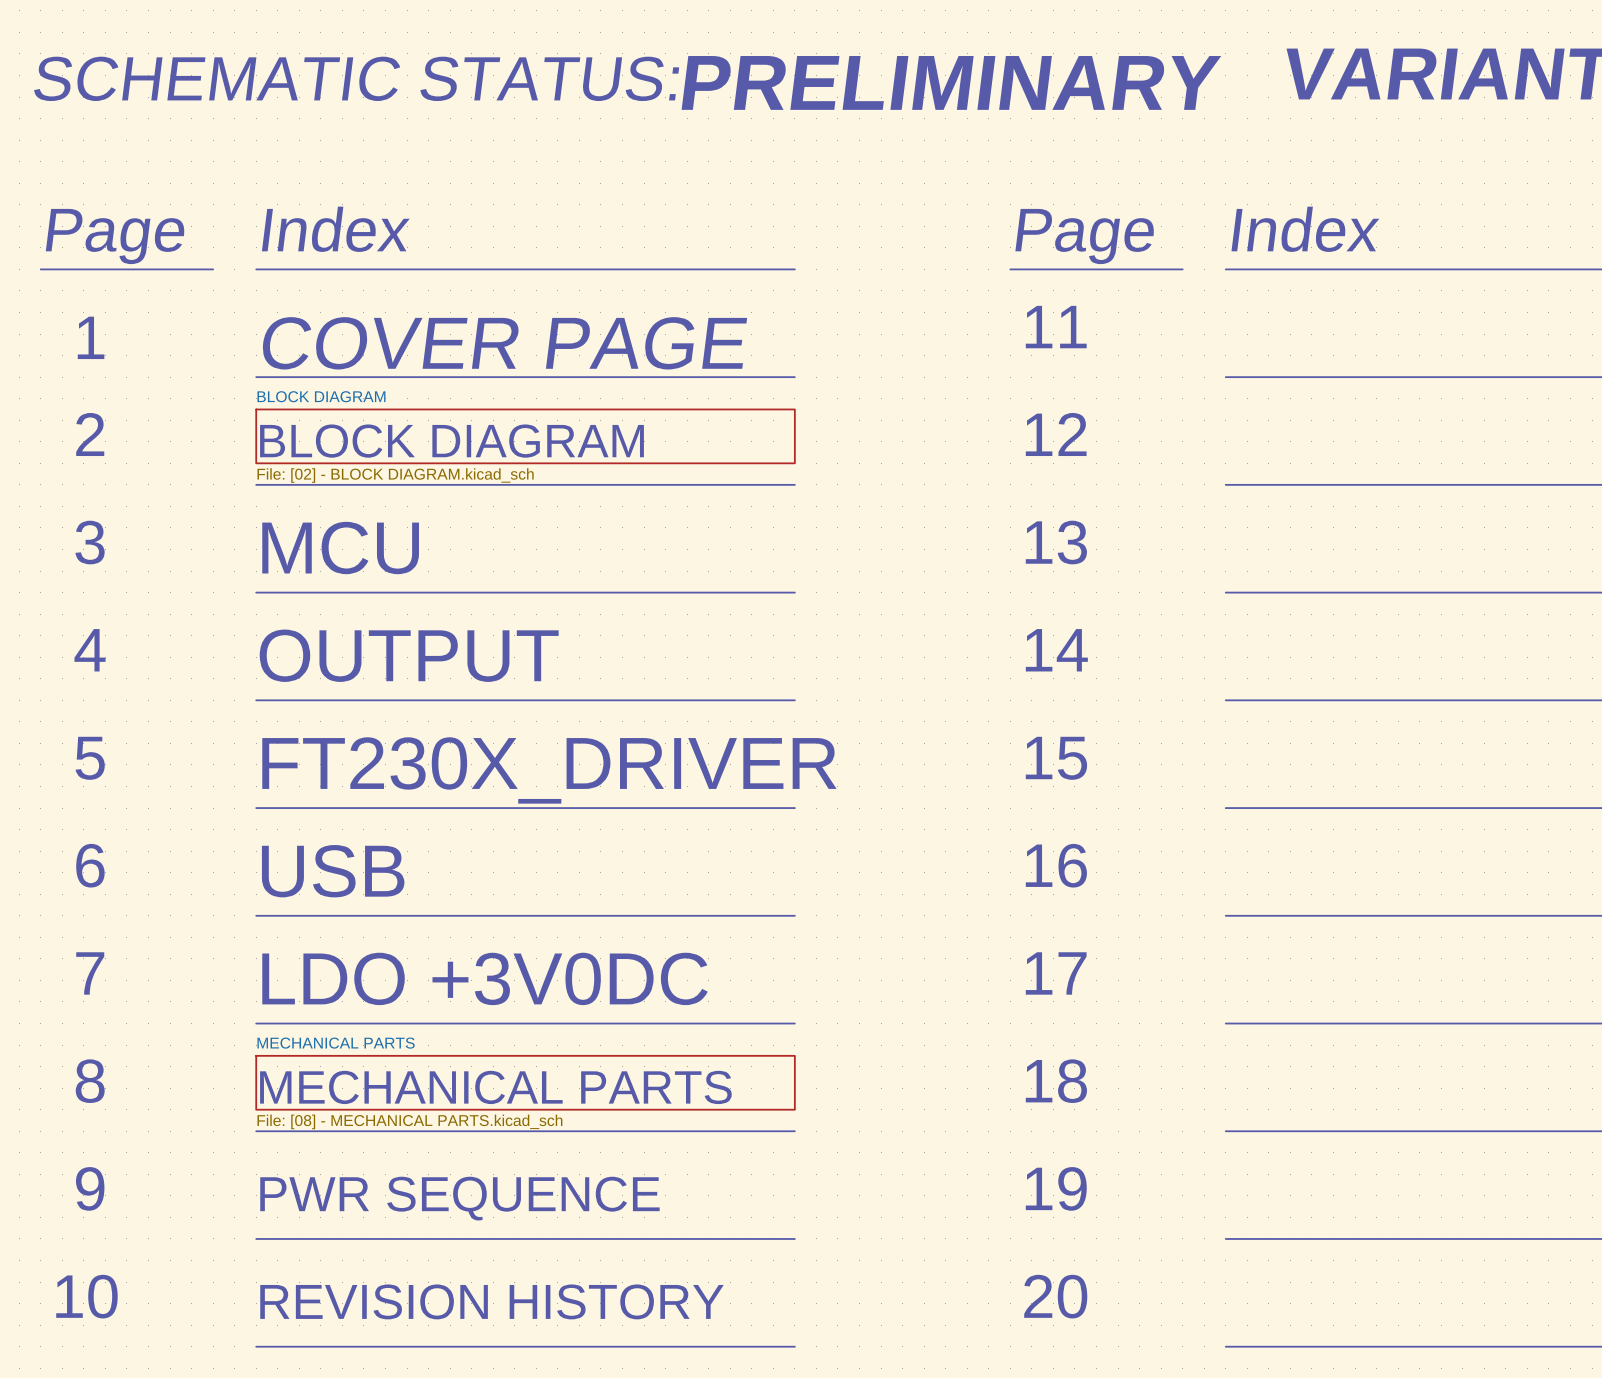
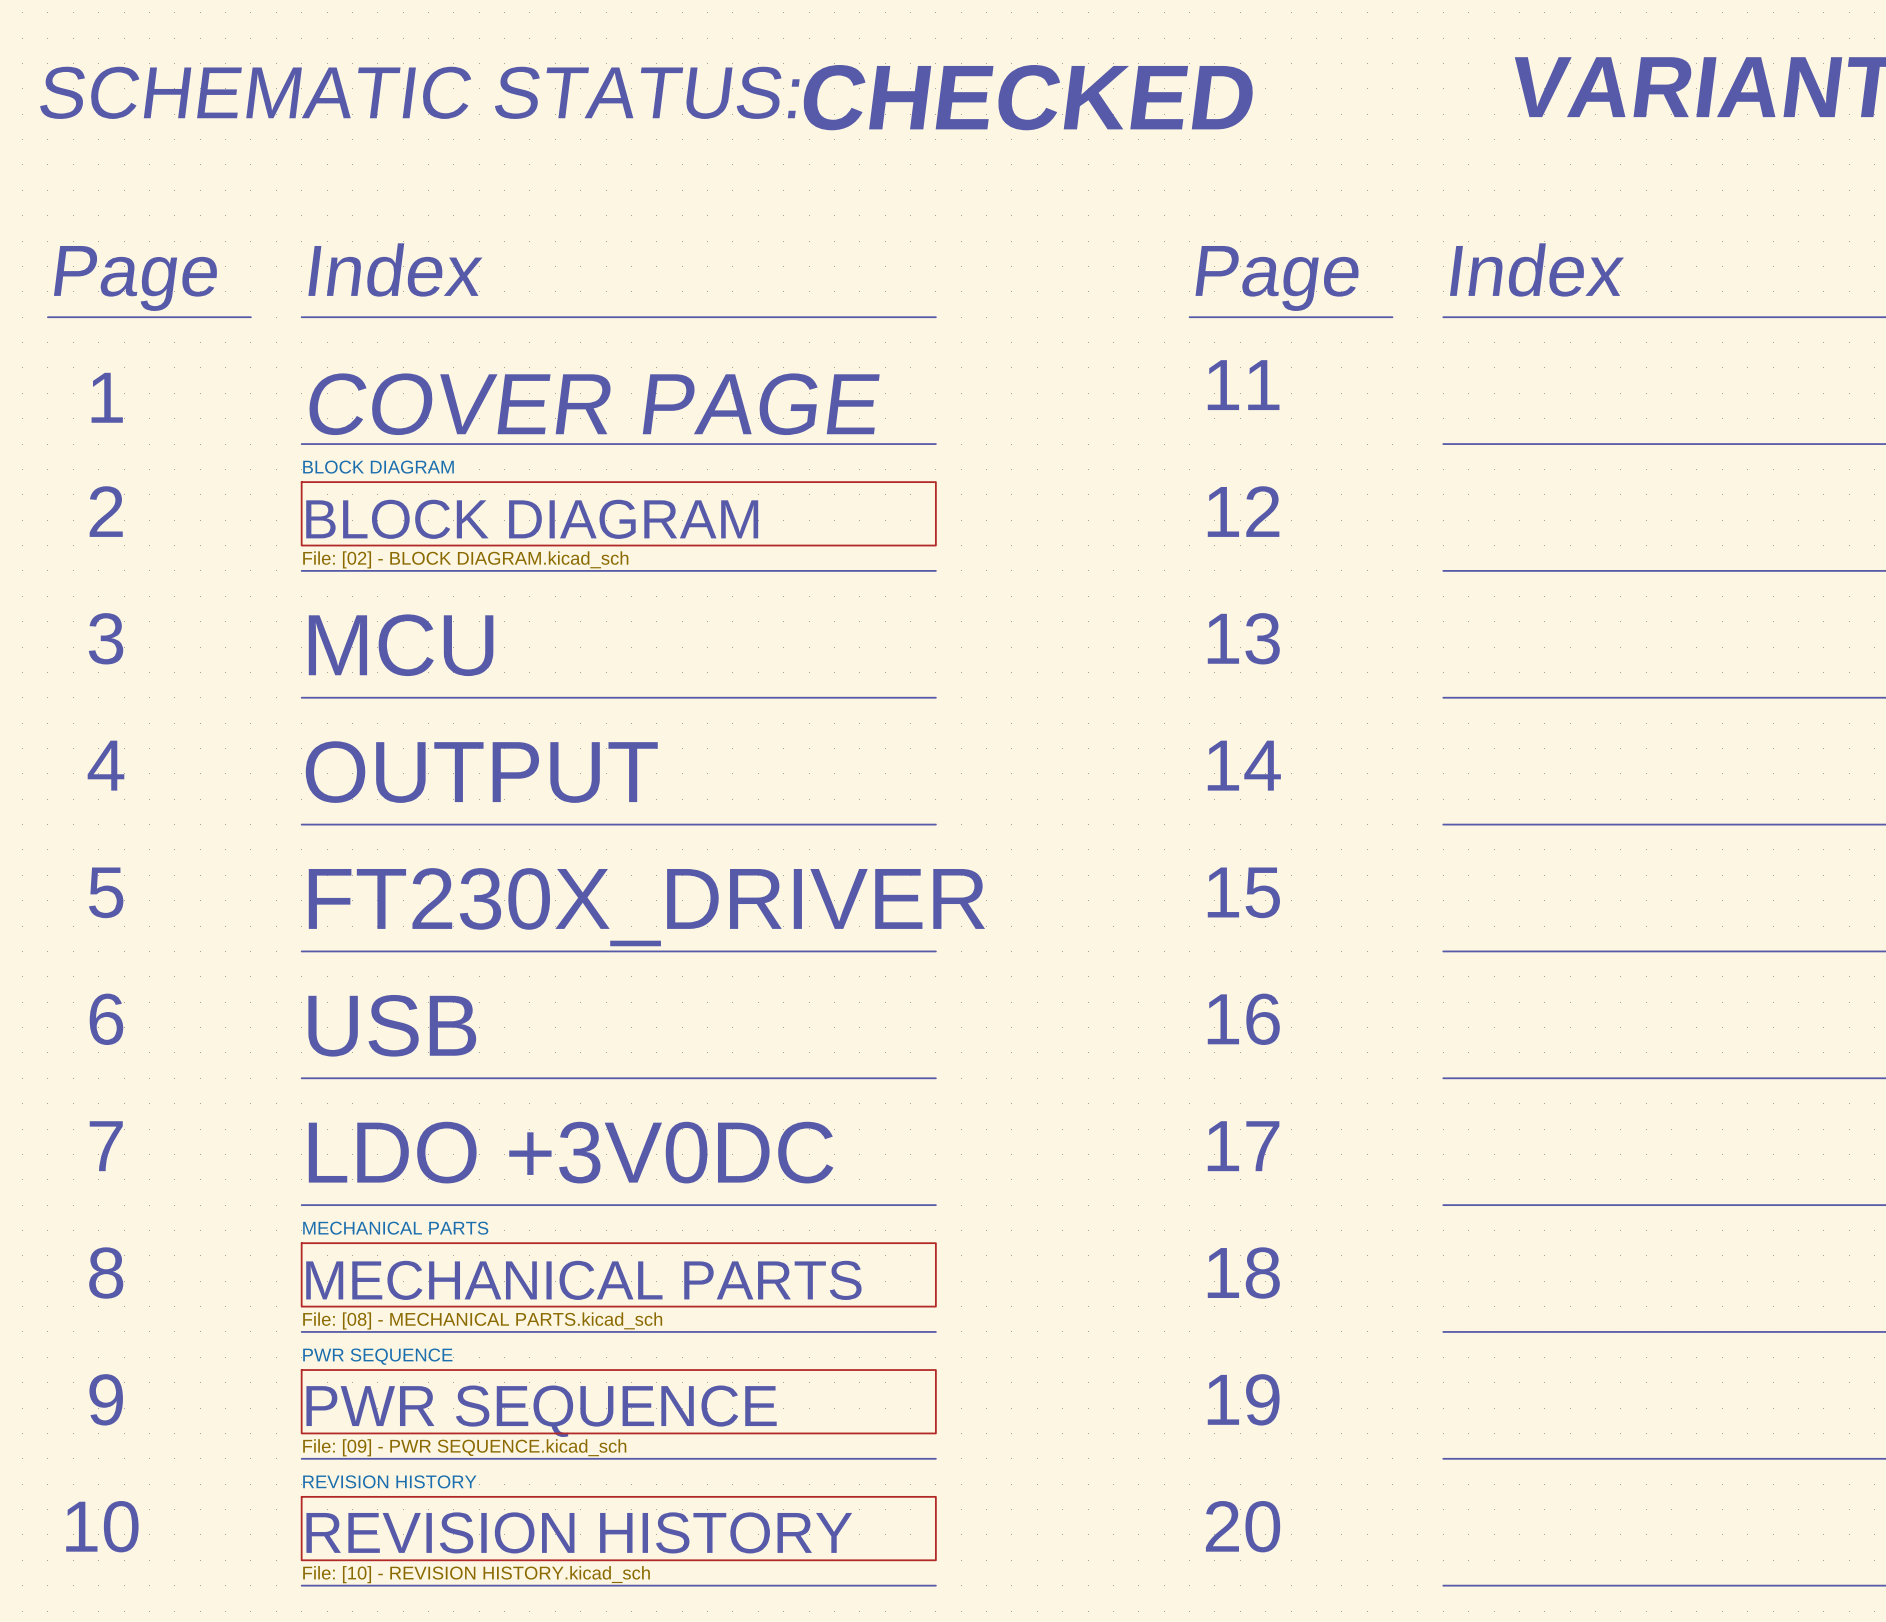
text: PRELIMINARY (951, 82) -> CHECKED (1028, 97)
sheet PWR SEQUENCE: none -> File: [09] - PWR SEQUENCE.kicad_sch (618, 1401)
sheet REVISION HISTORY: none -> File: [10] - REVISION HISTORY.kicad_sch (618, 1528)

